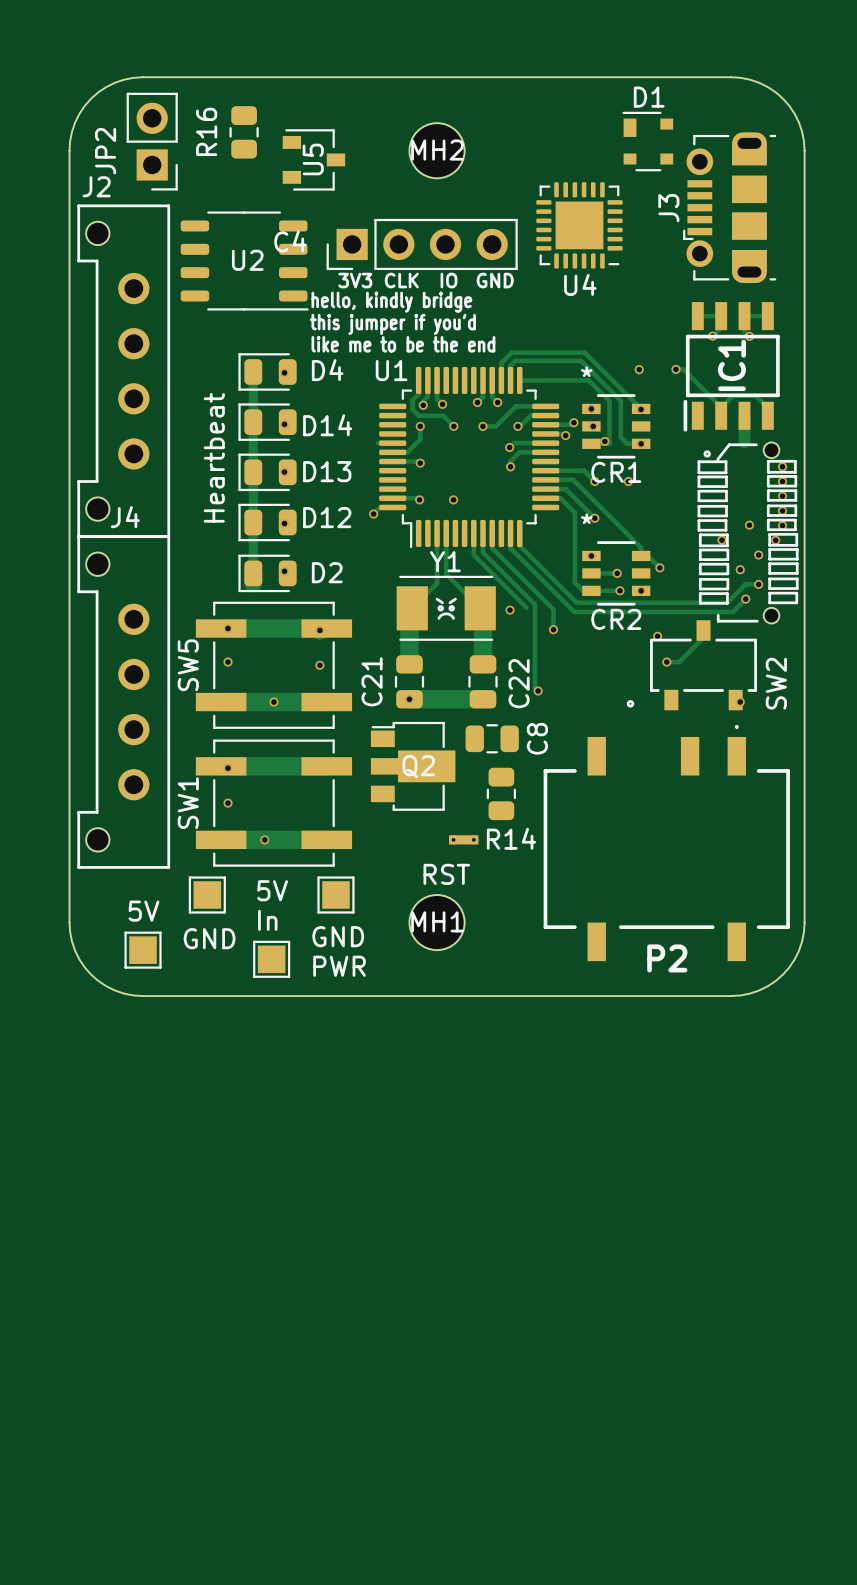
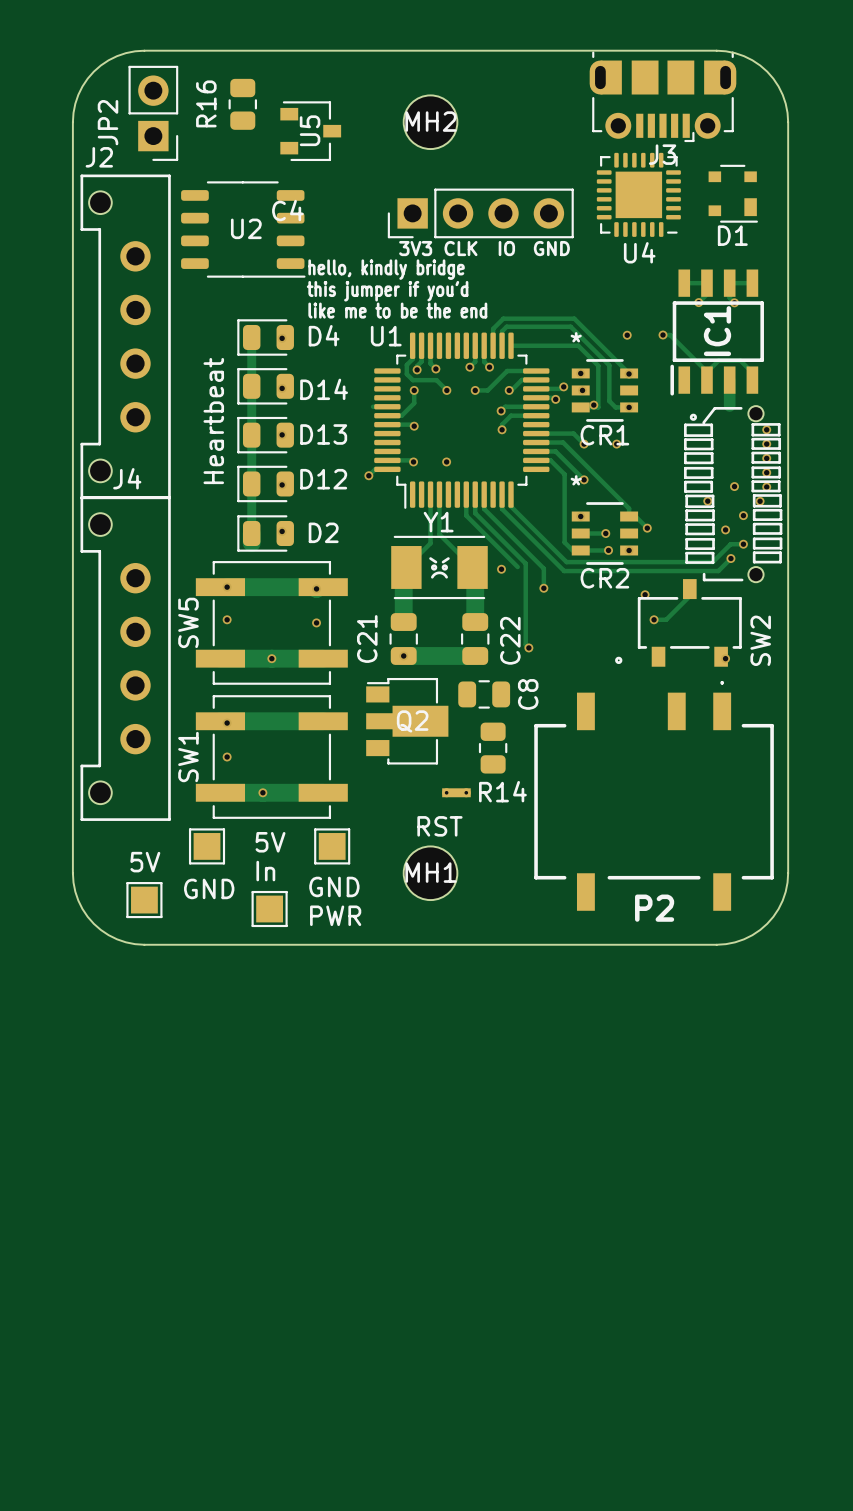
D1 rotation: 0° (647, 141) -> 180° (733, 193)
D1 position: (647, 141) -> (733, 193)
J3 rotation: 0° (729, 207) -> 90° counterclockwise (662, 96)
J3 position: (729, 207) -> (662, 96)
U4 position: (579, 225) -> (638, 194)
part position: (422, 244) -> (480, 213)
text position: 3V3 (355, 280) -> 3V3 (415, 248)
text: CLK (401, 280) -> none
text: IO (448, 280) -> CLK (460, 248)
text position: GND (495, 280) -> GND (551, 248)
text: none -> IO (506, 248)

